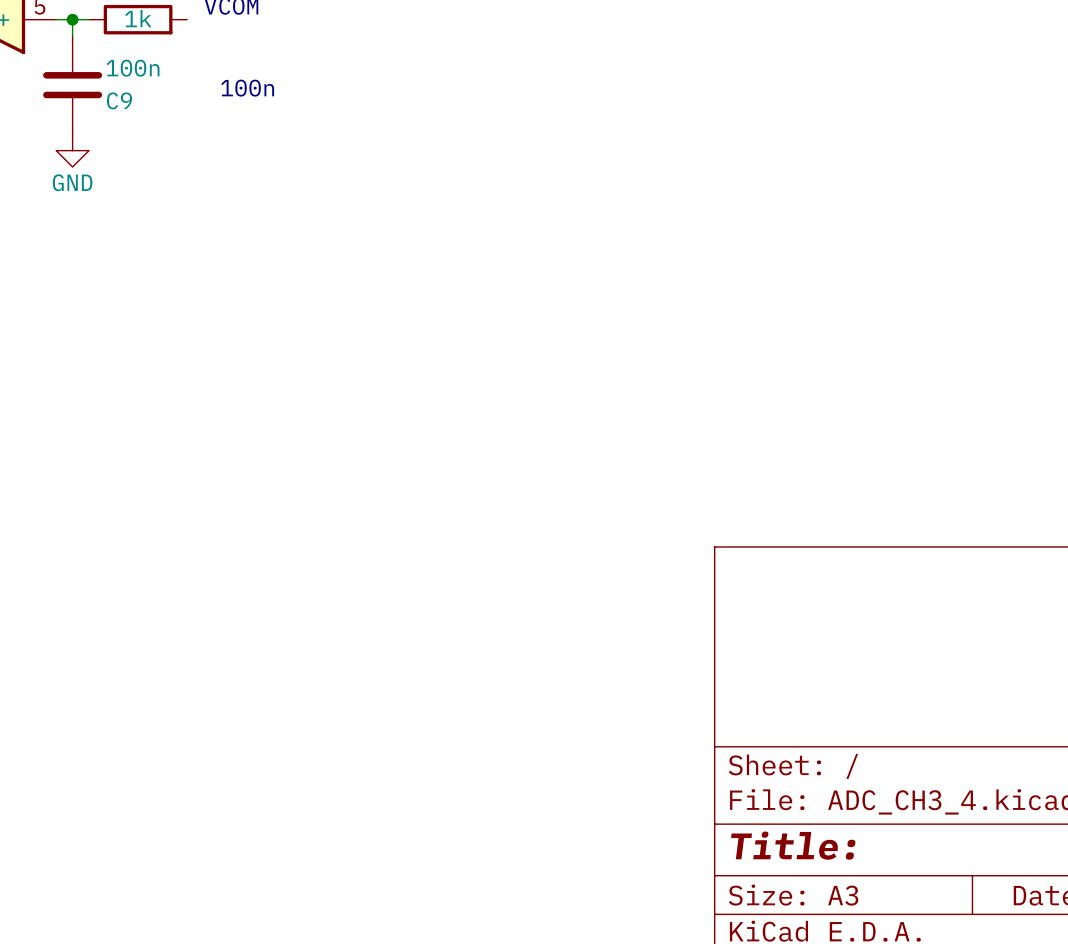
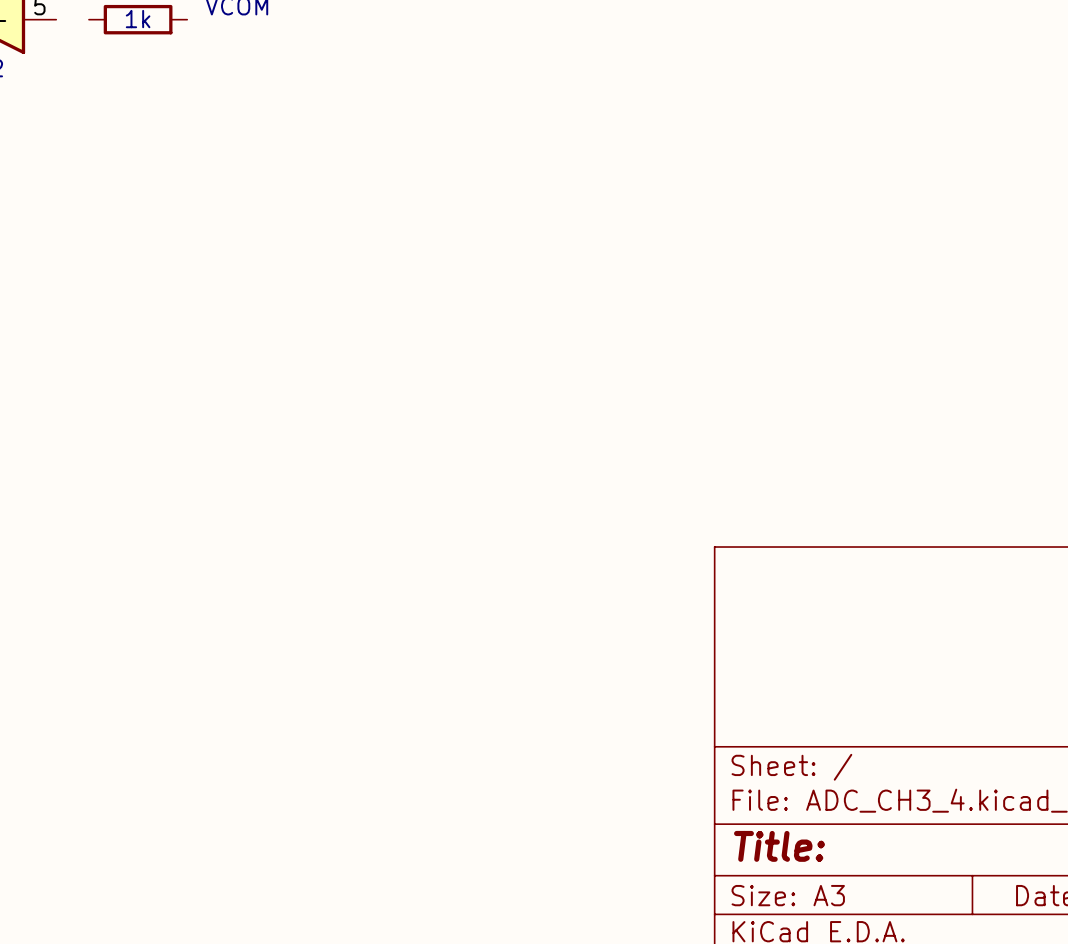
wire: (56, 19) (88, 19) -> none
wire: (72, 19) (72, 36) -> none
junction: (72, 19) -> none
C9: 100n (72, 85) -> none
text: 100n (247, 88) -> none
power symbol: GND (72, 150) -> none

